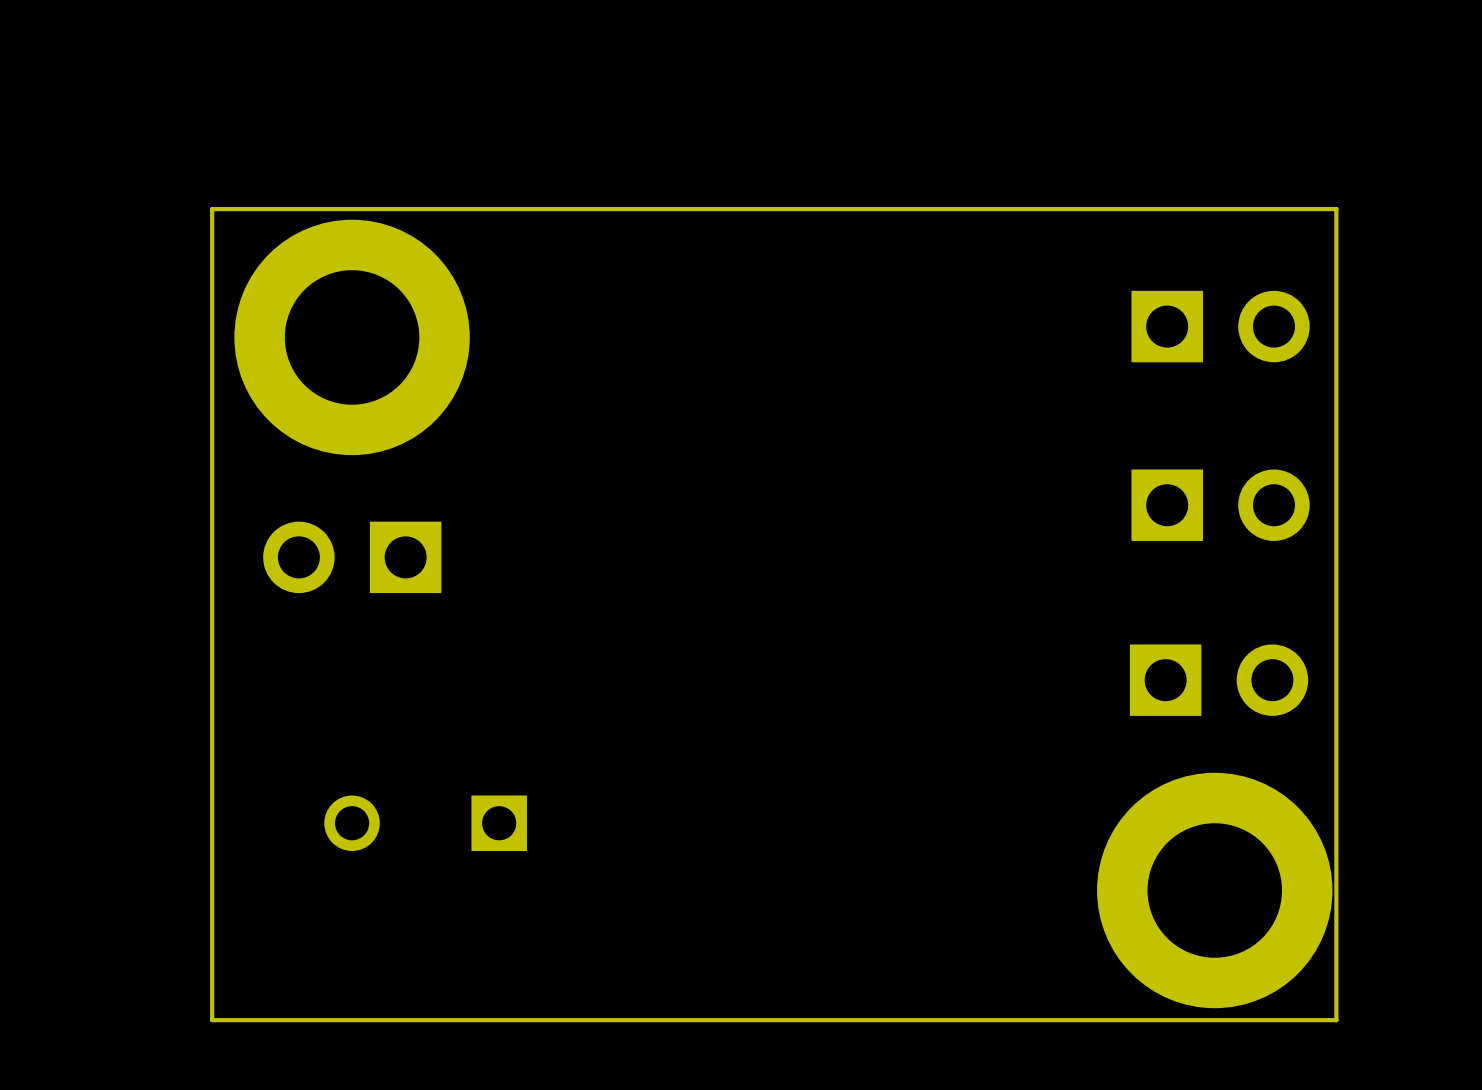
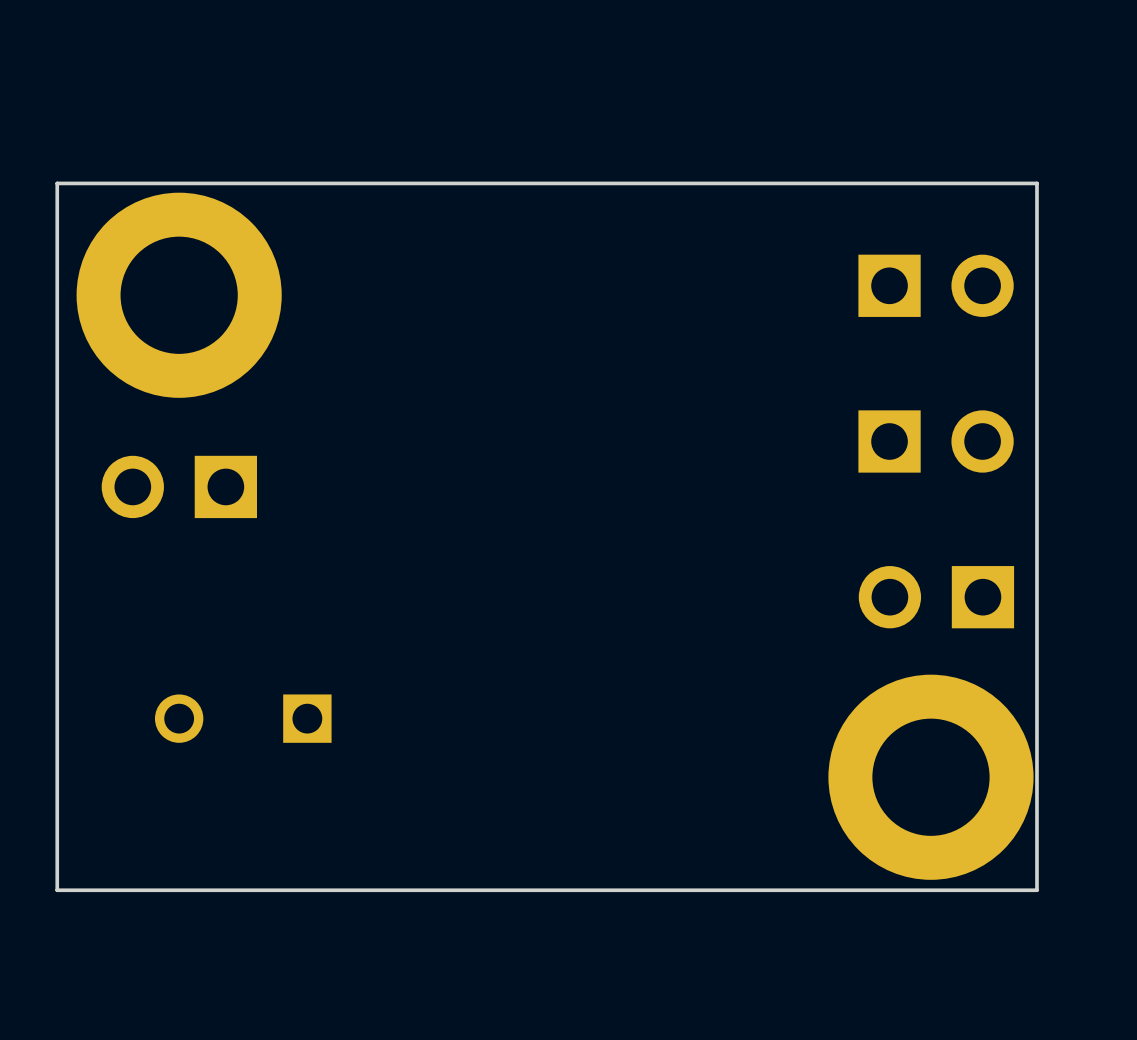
part rotation: 0° (1219, 680) -> 180° (936, 597)

